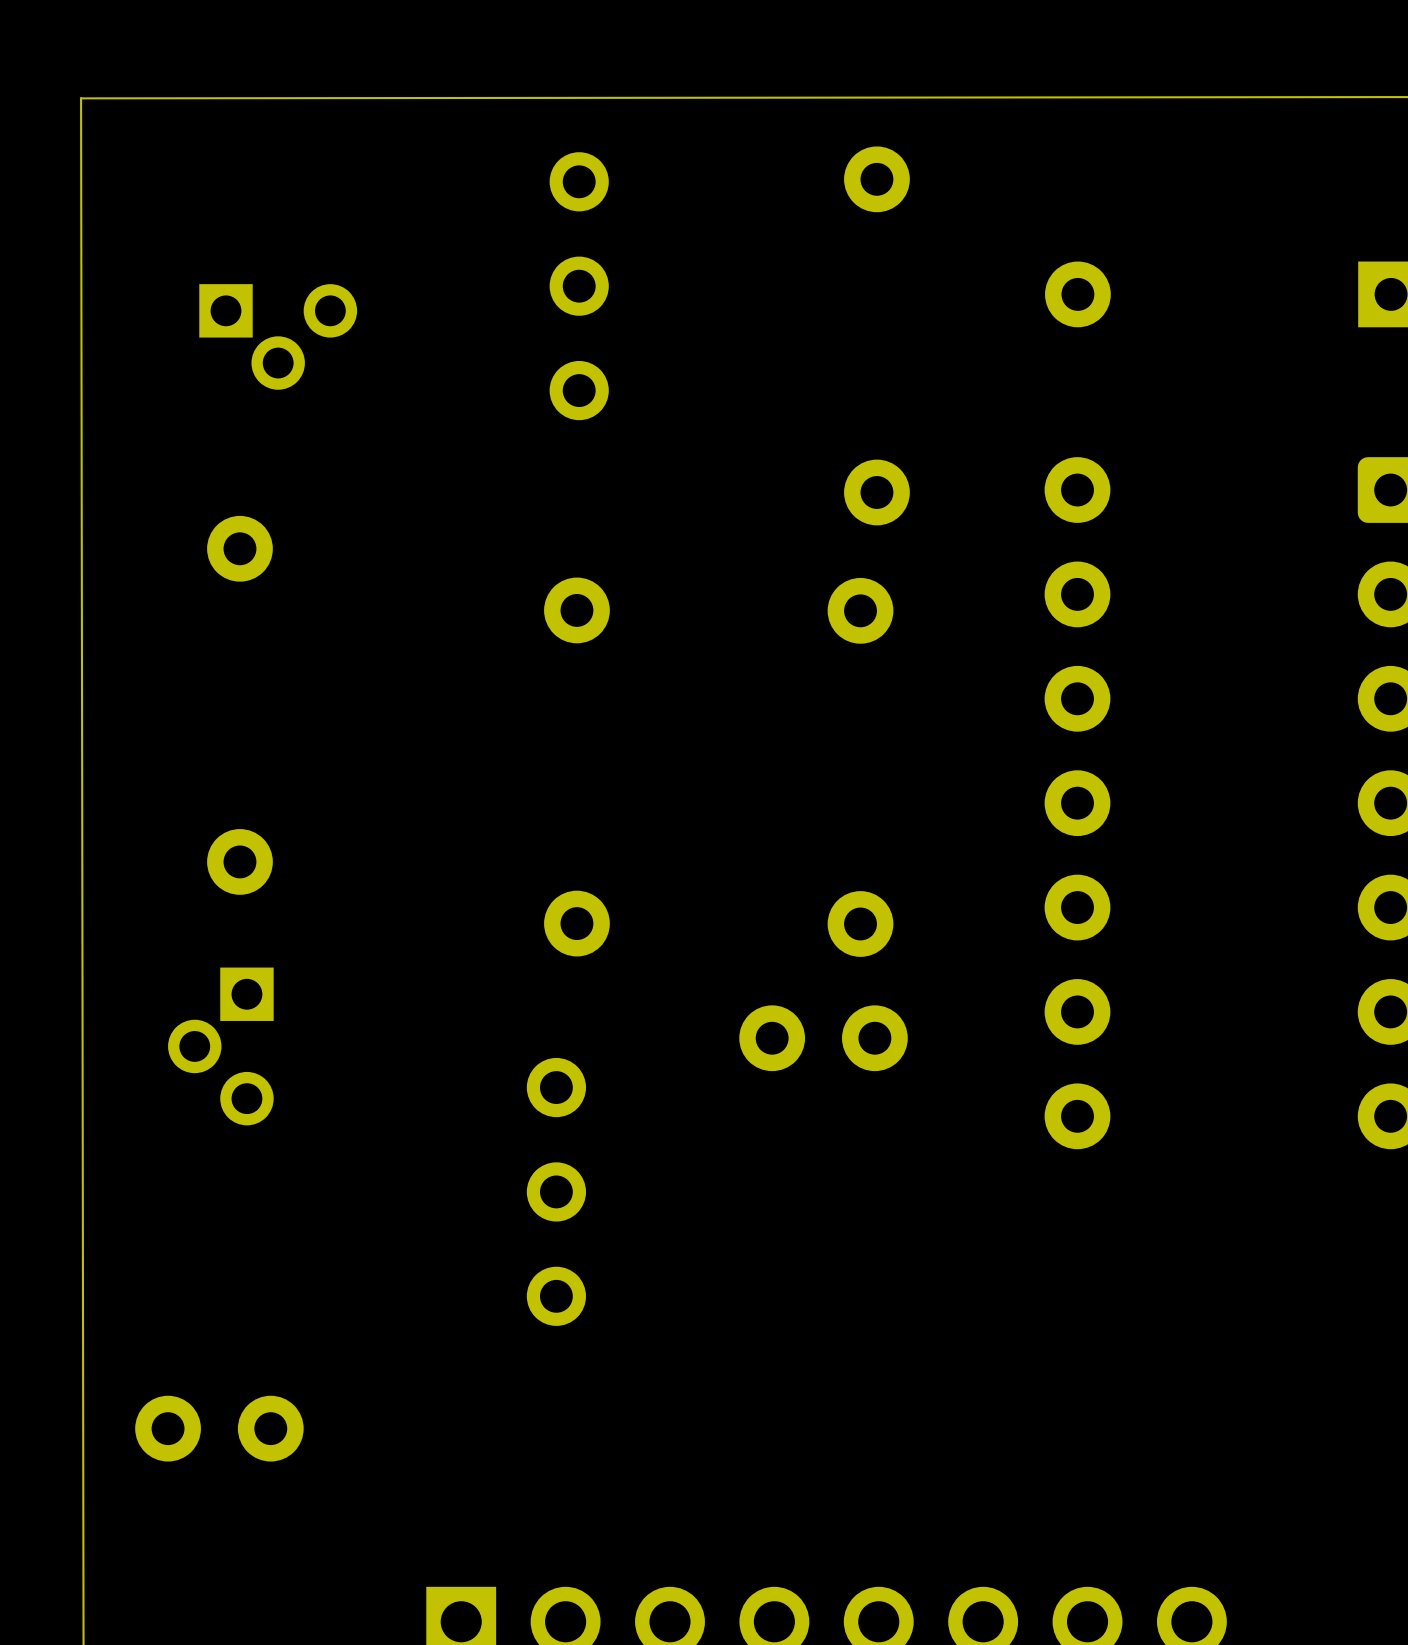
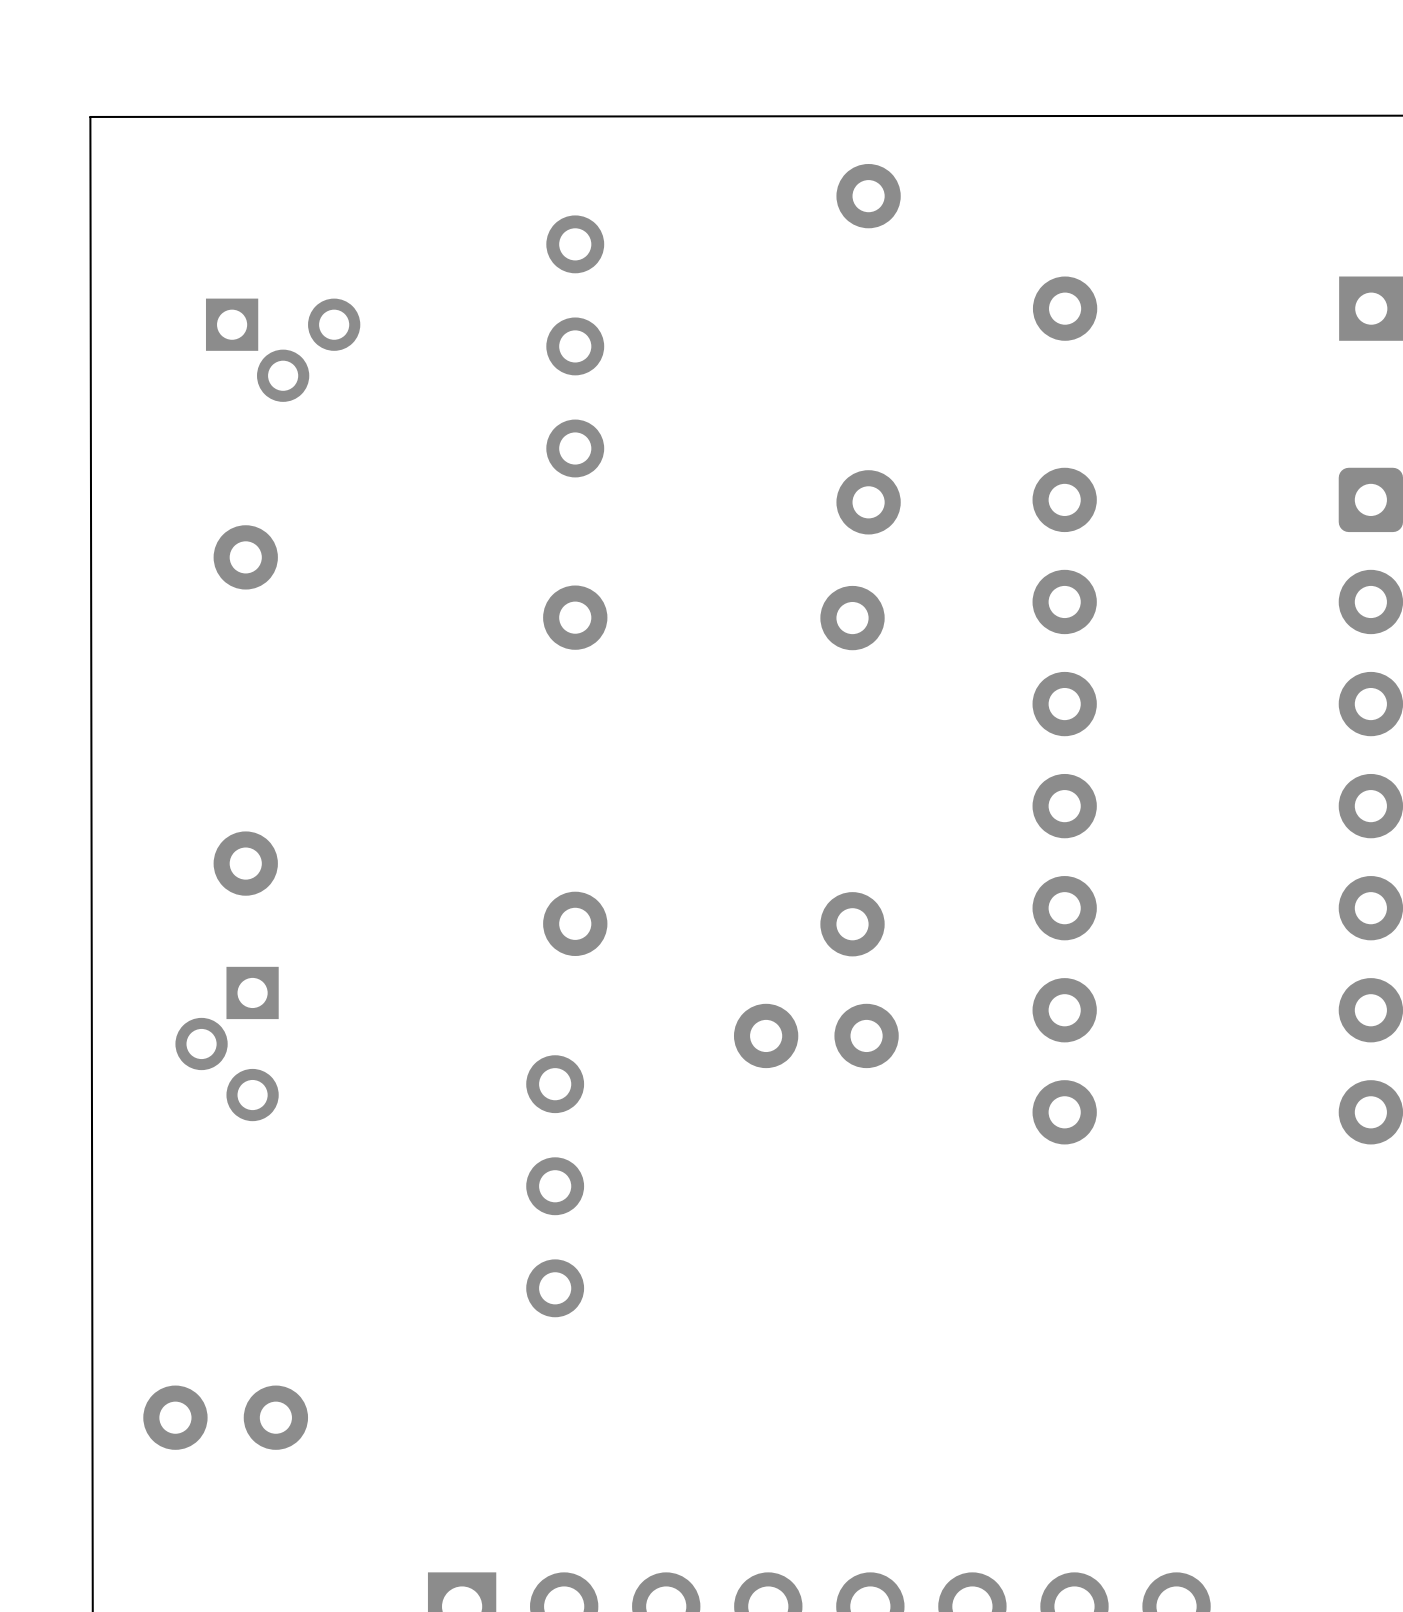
part position: (579, 286) -> (575, 346)

